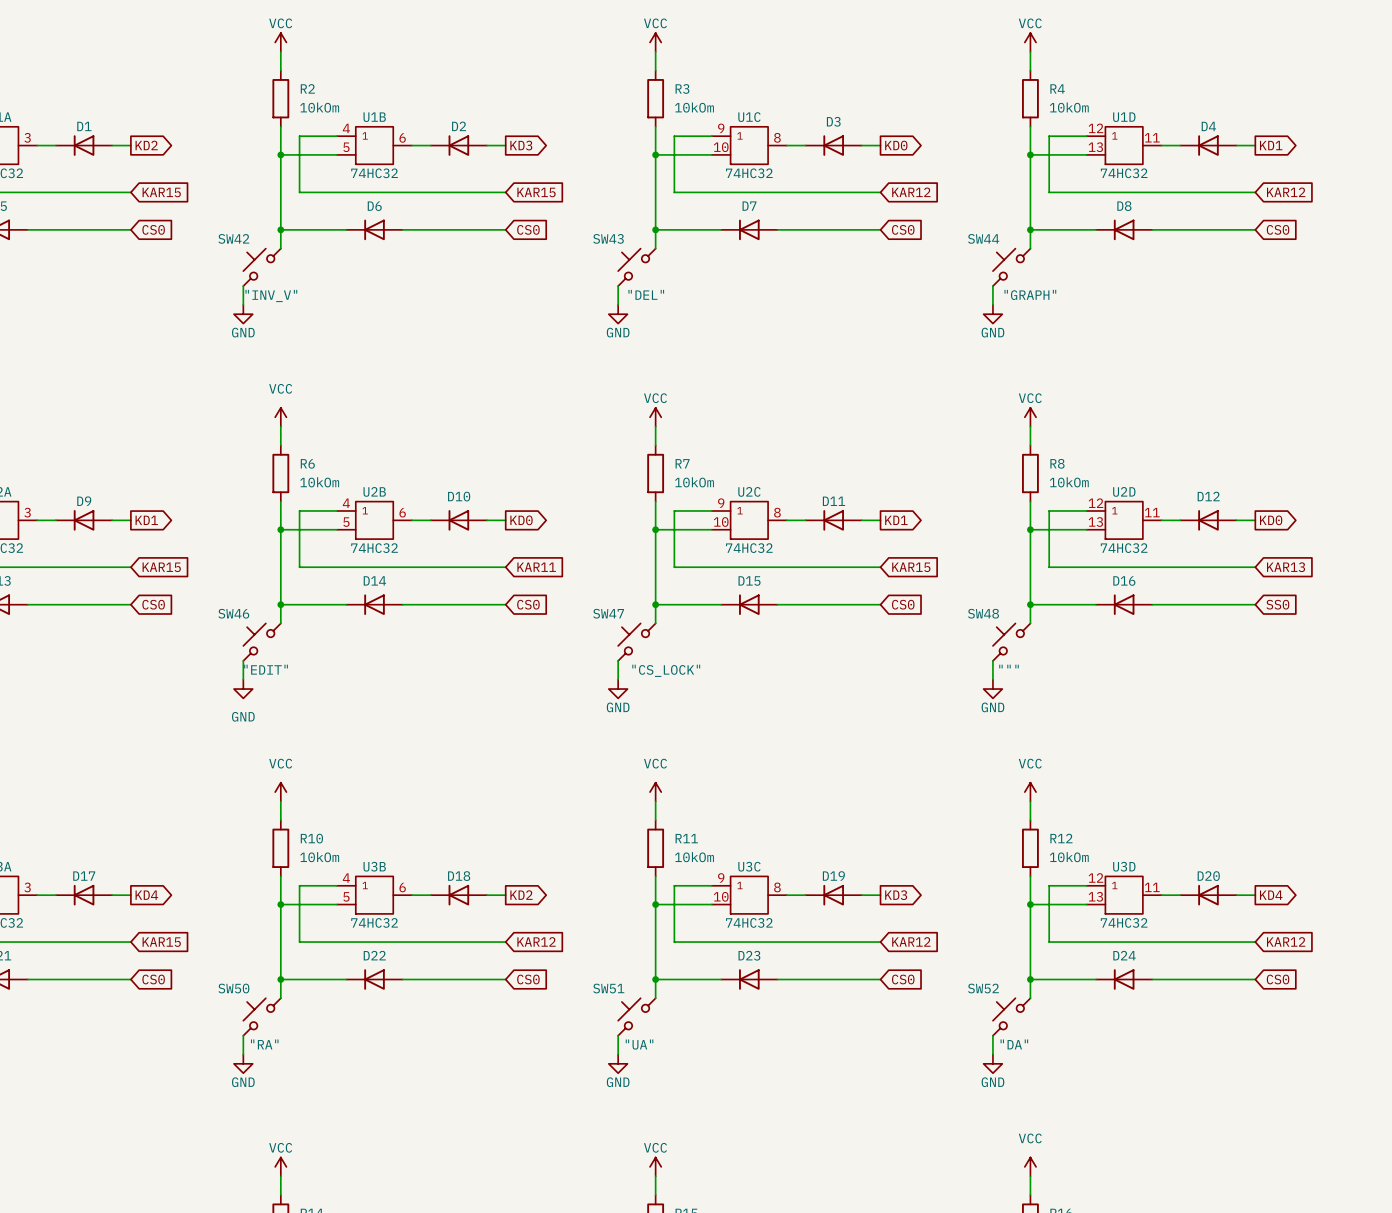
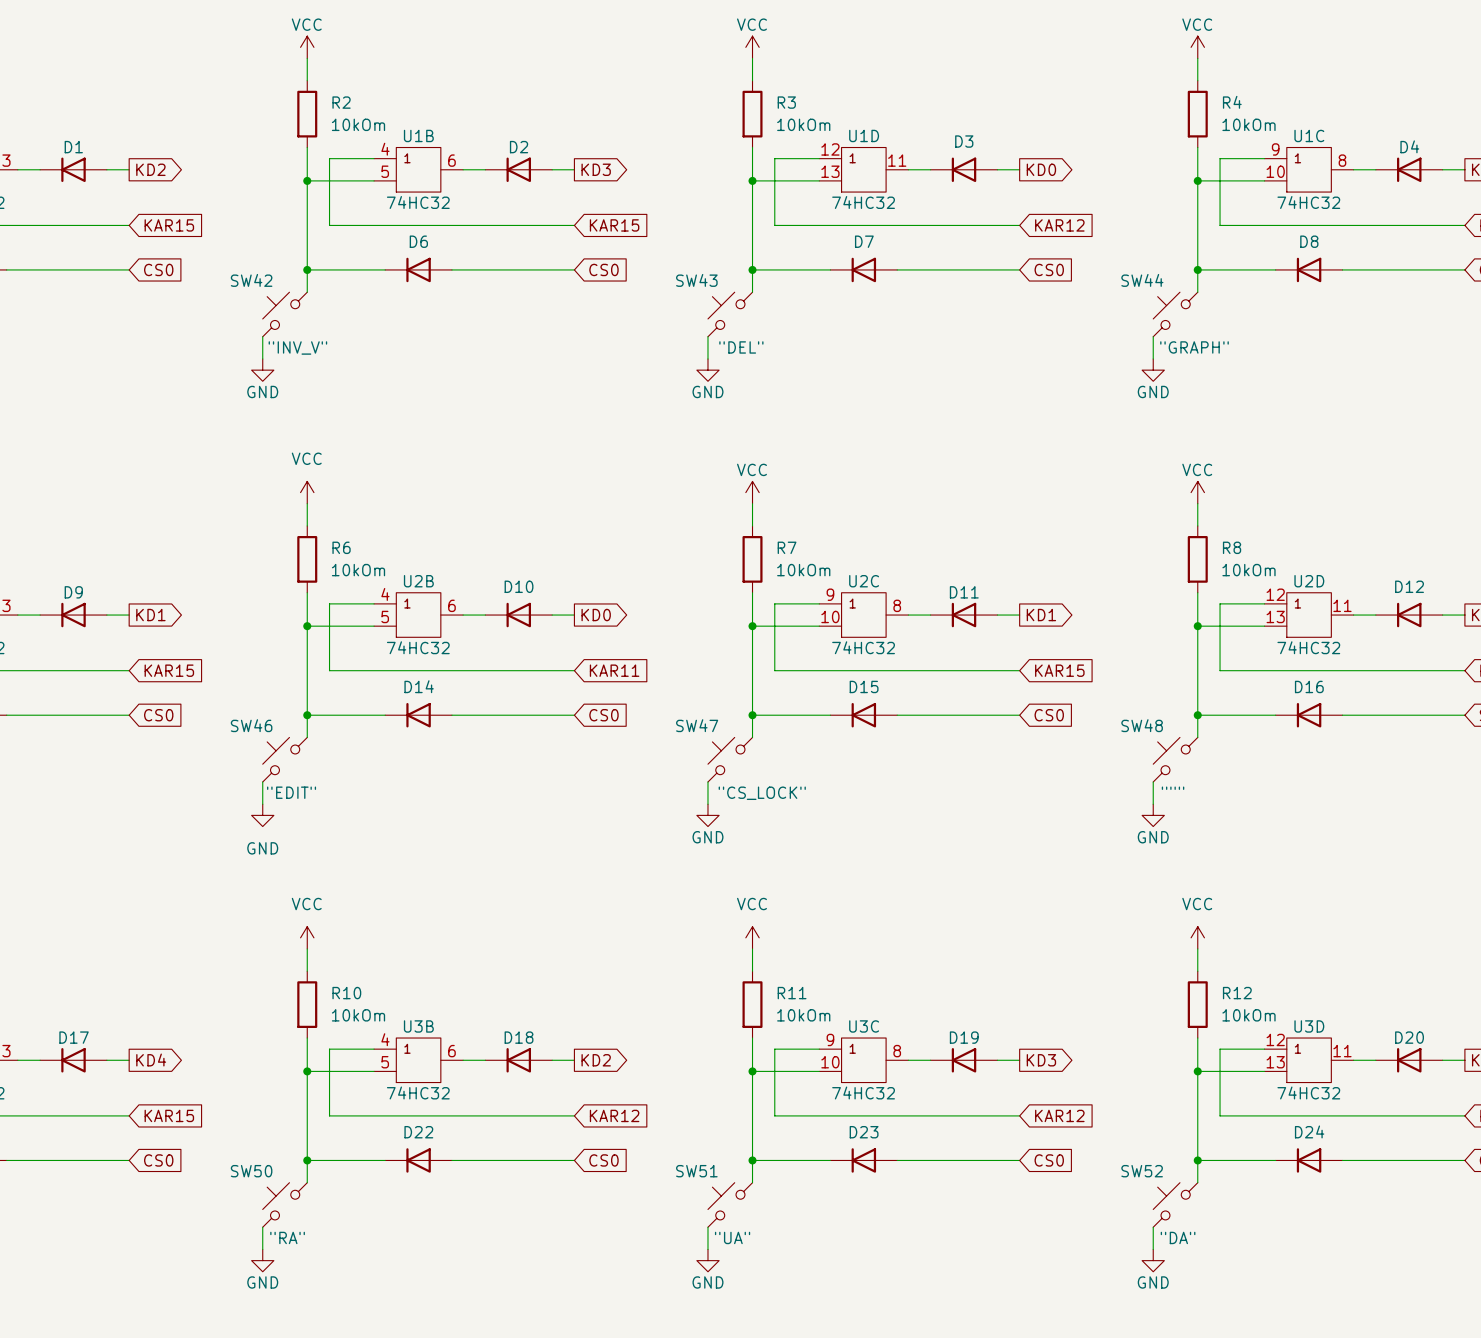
U1C position: (749, 145) -> (1309, 169)
U1D position: (1124, 145) -> (863, 169)

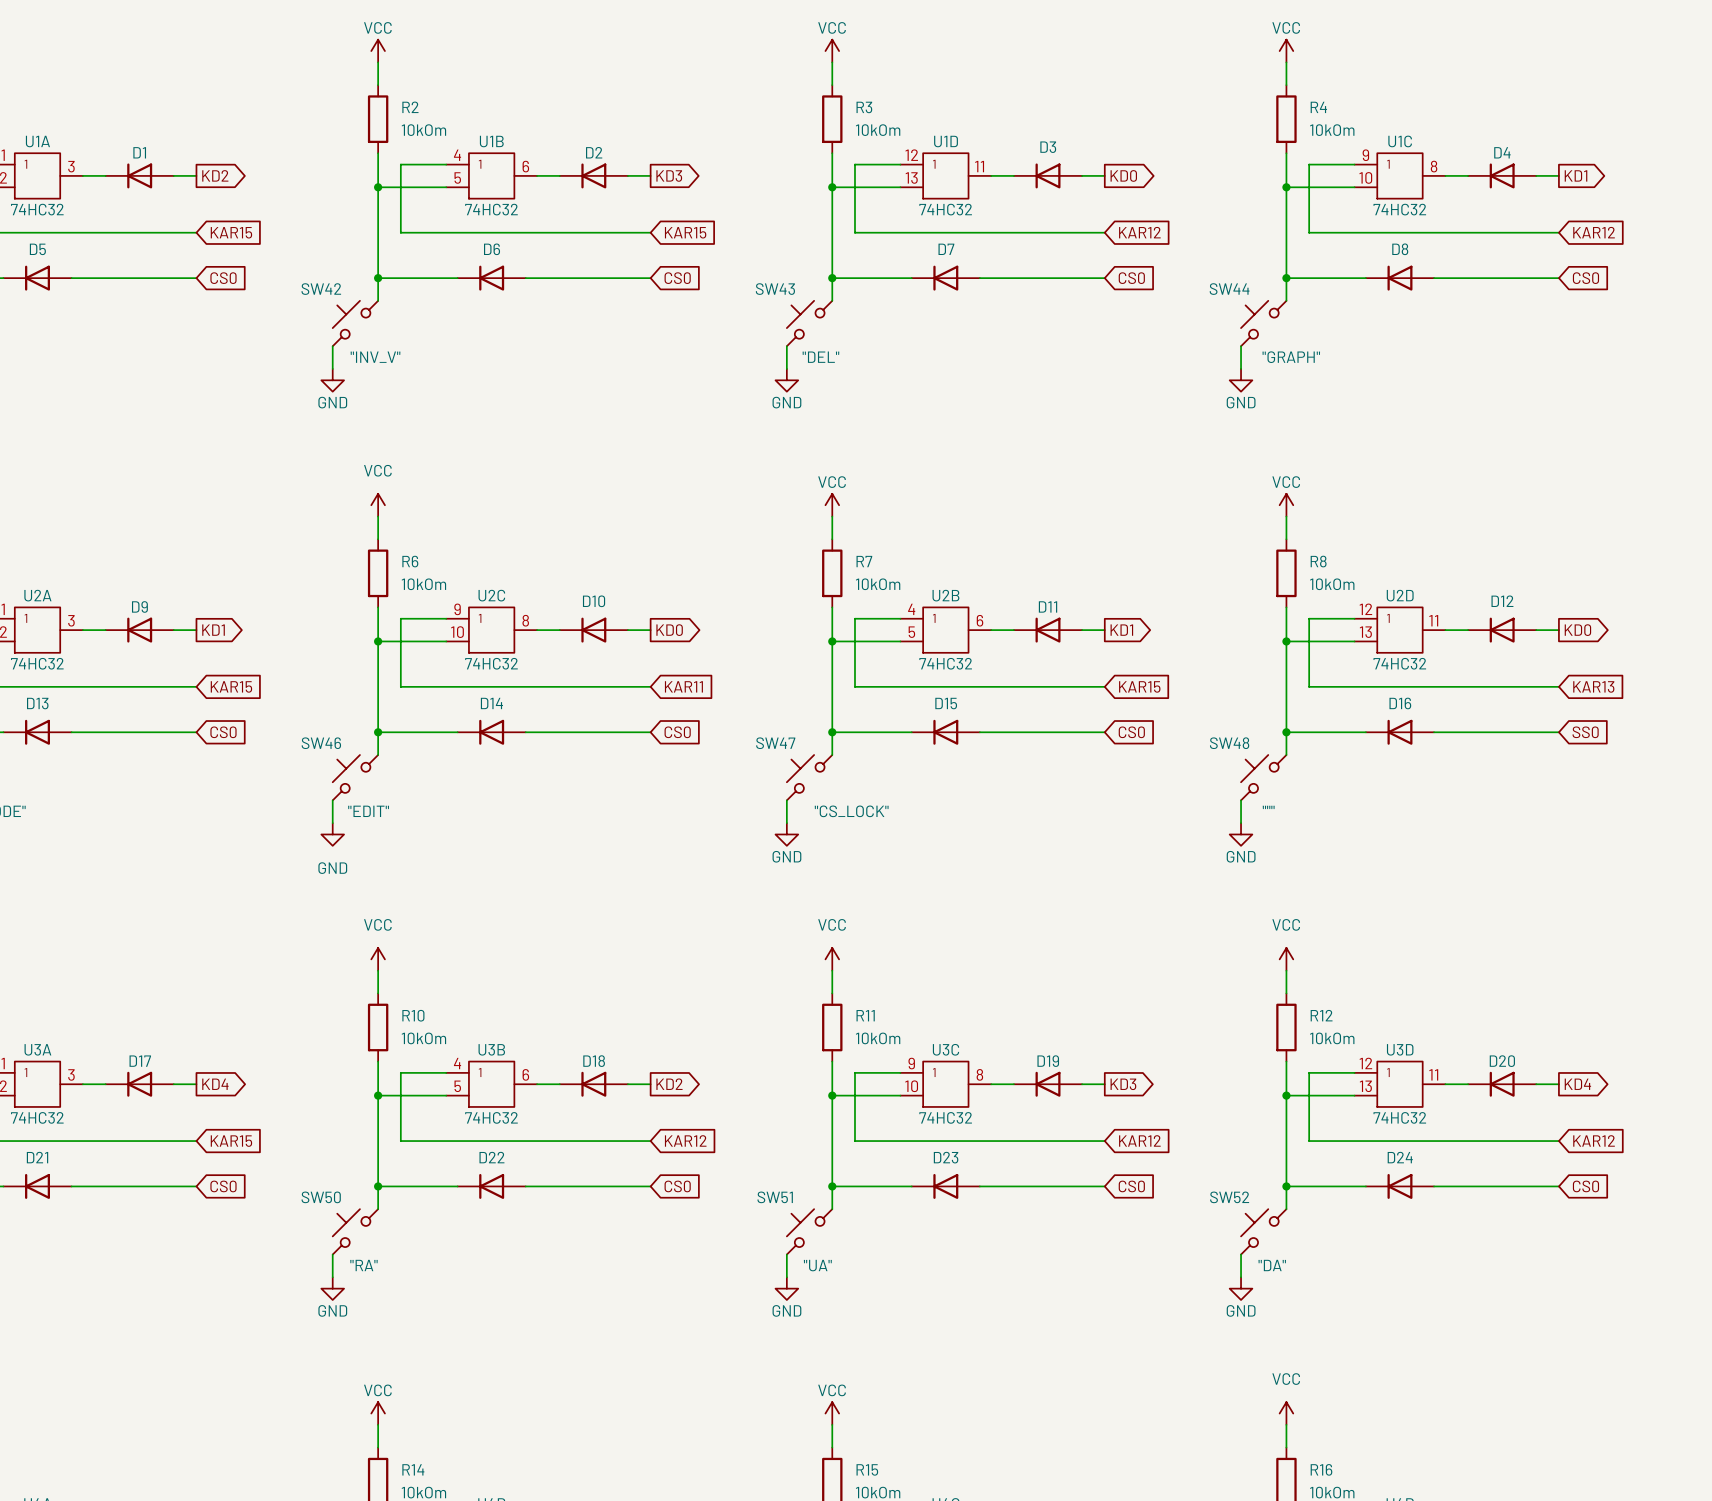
U2B position: (418, 615) -> (945, 630)
U2C position: (863, 615) -> (491, 630)

